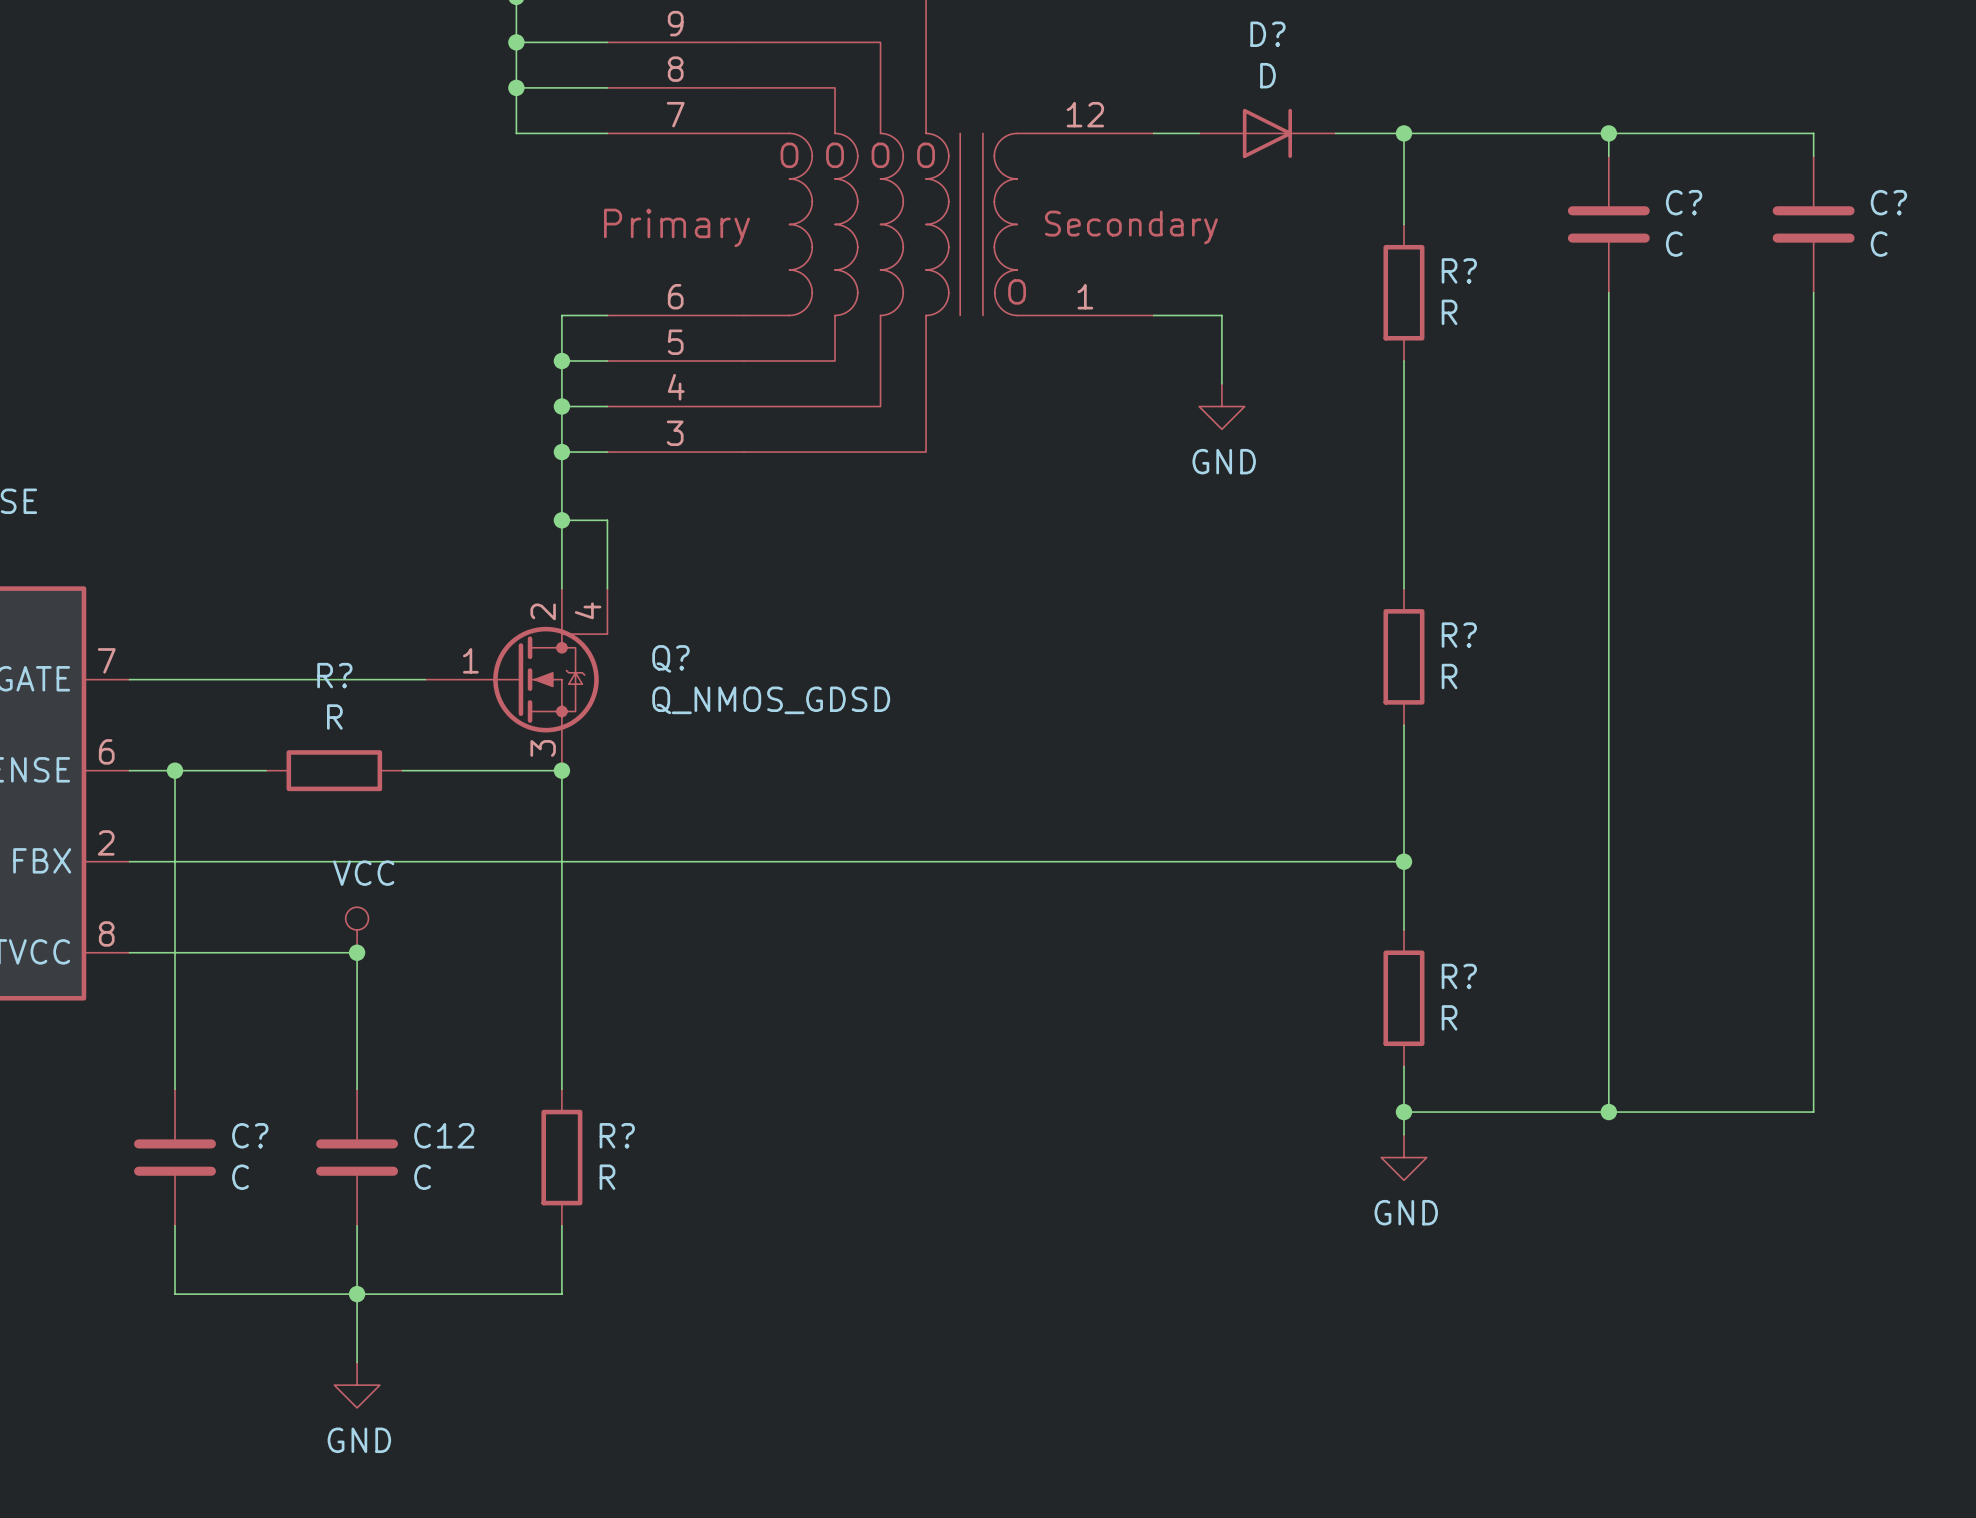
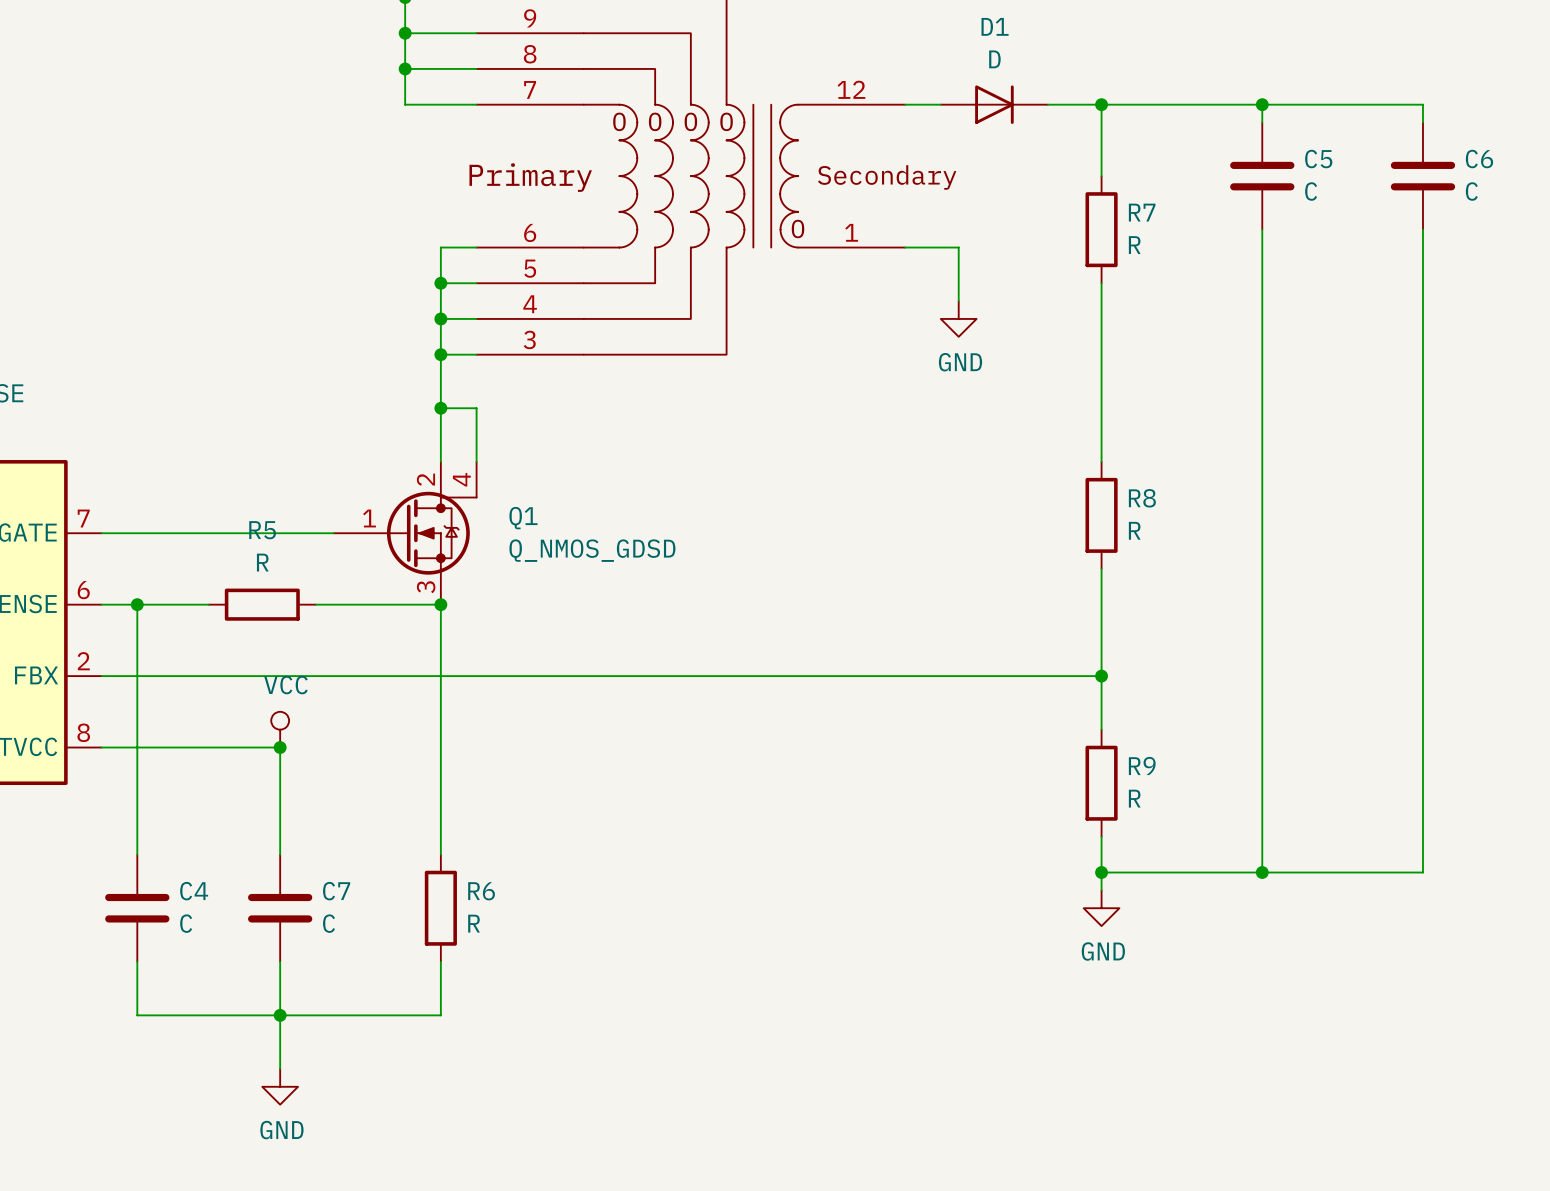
D? name: D? (1267, 34) -> D1 (995, 26)
C? name: C? (1684, 202) -> C5 (1318, 159)
C? name: C? (1888, 202) -> C6 (1479, 159)
R? name: R? (1459, 270) -> R7 (1142, 212)
R? name: R? (1459, 635) -> R8 (1142, 498)
Q? name: Q? (670, 658) -> Q1 (523, 518)
R? name: R? (334, 675) -> R5 (262, 530)
R? name: R? (1459, 976) -> R9 (1142, 765)
C? name: C? (250, 1135) -> C4 (194, 891)
C12 name: C12 (444, 1135) -> C7 (336, 891)
R? name: R? (617, 1135) -> R6 (481, 891)

